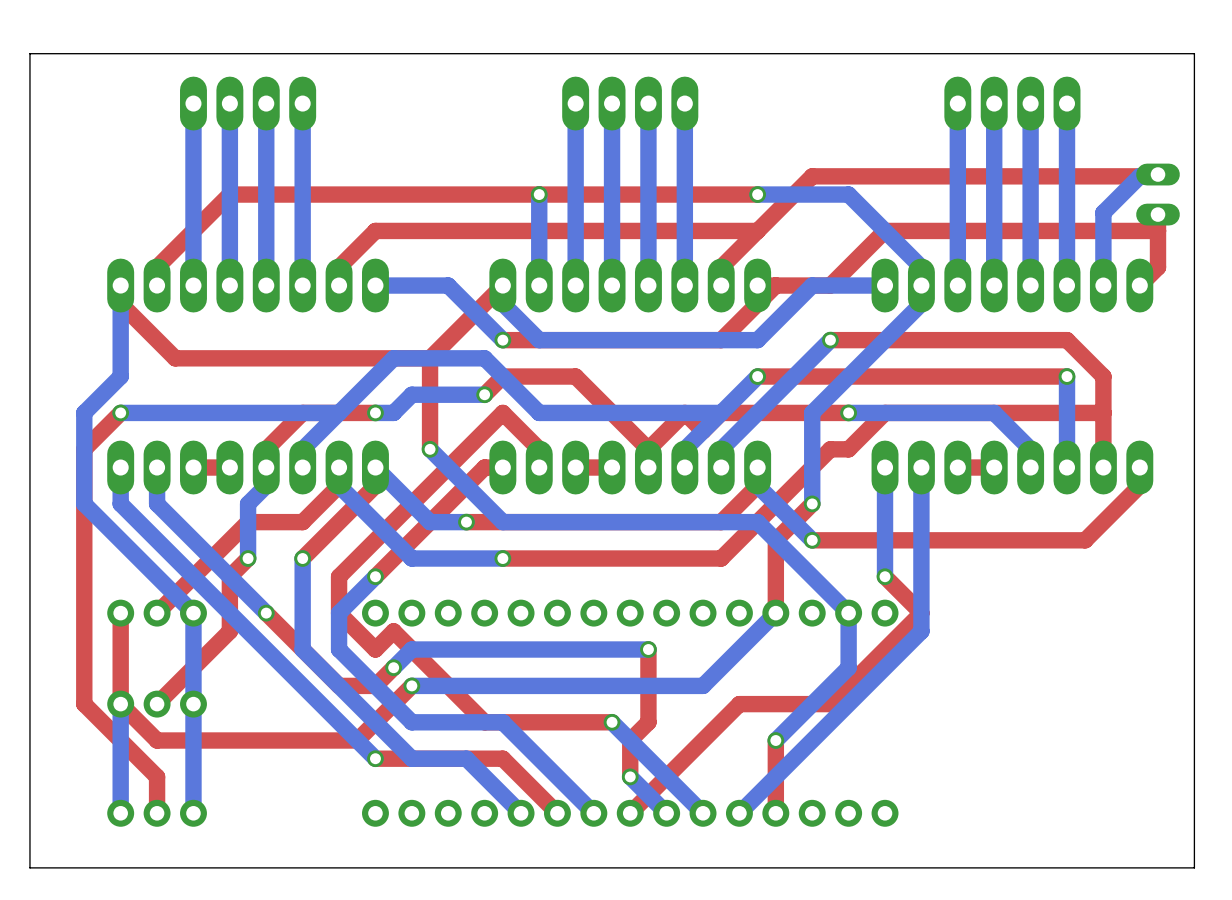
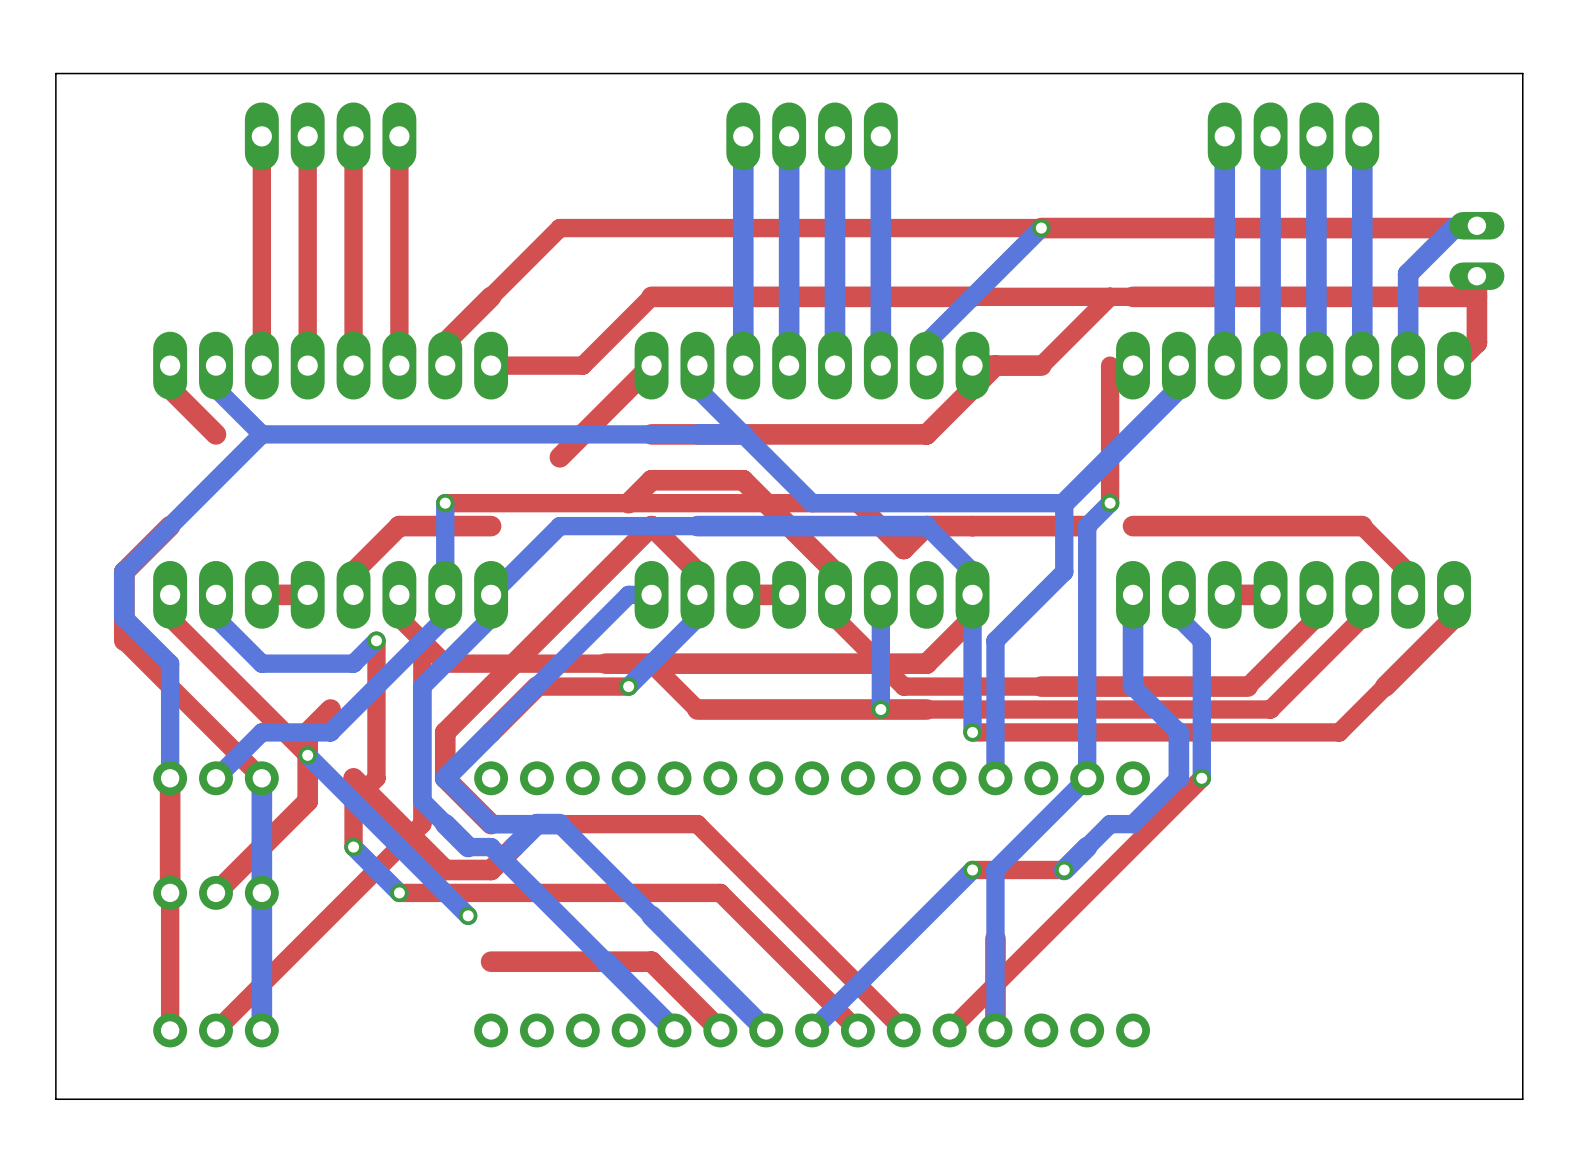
bottom track: (193, 103) (193, 285) -> none
top track: none -> (261, 136) (261, 365)
bottom track: (229, 103) (229, 285) -> none
top track: none -> (307, 136) (307, 365)
bottom track: (266, 103) (266, 285) -> none
top track: none -> (353, 136) (353, 365)
bottom track: (302, 103) (302, 285) -> none
top track: none -> (399, 136) (399, 365)
bottom track: none -> (1041, 228) (926, 342) (926, 365)
top track: (812, 176) (721, 267) (721, 285) -> (1041, 228) (559, 228) (491, 296)
via: none -> (1041, 228)
bottom track: (539, 194) (539, 285) -> none
via: (539, 194) -> none
bottom track: (757, 194) (848, 194) (921, 267) (921, 285) -> none
top track: (757, 194) (229, 194) (157, 267) (157, 285) -> none
via: (757, 194) -> none
top track: (502, 230) (375, 230) -> (651, 296) (582, 365) (491, 365)
top track: (885, 230) (830, 285) (812, 285) -> (1110, 296) (1041, 365)
top track: none -> (1133, 296) (972, 296)
bottom track: (120, 285) (120, 376) (84, 412) (84, 449) -> (261, 434) (124, 571)
bottom track: none -> (215, 365) (215, 388) (261, 434)
bottom track: (375, 285) (448, 285) (502, 340) -> none
bottom track: (502, 285) (502, 303) (539, 340) -> (261, 434) (697, 434)
top track: none -> (1110, 365) (1110, 503)
bottom track: (885, 285) (812, 285) (757, 340) (575, 340) -> none
top track: (157, 340) (175, 358) (430, 358) (430, 449) -> none
via: (502, 340) -> none
bottom track: (830, 340) (721, 449) (721, 467) -> none
top track: (830, 340) (1067, 340) (1103, 376) (1103, 449) -> none
via: (830, 340) -> none
bottom track: (757, 376) (684, 449) (684, 467) -> (880, 709) (880, 594)
via: (757, 376) -> none
bottom track: (1067, 376) (1067, 467) -> none
top track: (1067, 376) (757, 376) -> none
via: (1067, 376) -> none
bottom track: none -> (445, 503) (445, 594)
via: none -> (445, 503)
bottom track: (484, 394) (411, 394) (393, 412) (375, 412) -> none
via: (484, 394) -> none
bottom track: (830, 394) (812, 412) (812, 503) -> none
bottom track: none -> (1110, 503) (1087, 526) (1087, 778) (995, 869) (995, 1030)
via: none -> (1110, 503)
via: (120, 412) -> none
bottom track: (339, 412) (120, 412) -> none
via: (375, 412) -> none
bottom track: (539, 412) (484, 358) (393, 358) (302, 449) (302, 467) -> (697, 526) (559, 526) (491, 594) (491, 617) (422, 686) (422, 801) (445, 824)
top track: (684, 412) (648, 449) -> (880, 526) (857, 503) (445, 503)
bottom track: none -> (926, 526) (972, 571) (972, 594)
bottom track: (848, 412) (994, 412) (1030, 449) (1030, 467) -> none
via: (848, 412) -> none
top track: (885, 412) (848, 449) (830, 449) (721, 558) -> (1362, 594) (1362, 617) (1270, 709) (926, 709)
top track: (1103, 412) (1067, 412) -> (1408, 571) (1362, 526)
bottom track: (430, 449) (502, 522) (757, 522) (848, 613) (848, 667) -> none
via: (430, 449) -> none
bottom track: (120, 467) (120, 503) (375, 758) -> none
top track: none -> (170, 594) (170, 617) (307, 755)
bottom track: (266, 467) (266, 485) (248, 503) (248, 558) -> none
top track: none -> (399, 594) (399, 617) (445, 663) (605, 663)
top track: (339, 467) (339, 485) (302, 522) (248, 522) (157, 613) -> none
bottom track: (375, 467) (430, 522) (466, 522) -> none
top track: (375, 467) (375, 485) (302, 558) -> none
bottom track: none -> (651, 594) (628, 594) (491, 732)
top track: (502, 467) (484, 467) (411, 540) -> (628, 686) (536, 686)
bottom track: none -> (697, 594) (697, 617) (628, 686)
top track: none -> (834, 594) (834, 617) (903, 686) (1041, 686)
bottom track: (84, 485) (84, 503) (193, 613) -> (124, 617) (170, 663) (170, 778)
bottom track: (157, 485) (157, 503) (266, 613) -> (215, 617) (261, 663) (353, 663) (376, 640)
bottom track: (339, 485) (411, 558) (502, 558) -> (445, 617) (330, 732) (261, 732) (215, 778)
bottom track: (757, 485) (812, 540) -> (972, 617) (972, 732)
bottom track: (921, 485) (921, 576) -> (1178, 617) (1201, 640) (1201, 778)
top track: (84, 503) (84, 704) (157, 776) (157, 813) -> (124, 640) (261, 778)
top track: none -> (376, 640) (376, 778) (353, 801) (353, 847)
via: none -> (376, 640)
top track: none -> (422, 640) (422, 824) (215, 1030)
top track: (812, 503) (775, 540) (775, 613) -> none
via: (812, 503) -> none
via: (466, 522) -> none
via: none -> (628, 686)
via: (812, 540) -> none
bottom track: (885, 540) (885, 576) -> (1133, 686) (1178, 732)
top track: (1085, 540) (976, 540) -> (1316, 594) (1316, 617) (1247, 686)
top track: none -> (1385, 686) (1339, 732) (972, 732)
via: (248, 558) -> none
bottom track: (302, 558) (302, 649) (411, 758) (466, 758) -> none
via: (302, 558) -> none
via: (502, 558) -> none
top track: (539, 558) (502, 558) -> (697, 709) (651, 663)
via: none -> (880, 709)
via: (375, 576) -> none
via: none -> (972, 732)
top track: (885, 576) (921, 613) (830, 704) (739, 704) (630, 813) -> none
via: (885, 576) -> none
bottom track: none -> (307, 755) (468, 915)
via: none -> (307, 755)
via: (266, 613) -> none
bottom track: (339, 613) (339, 649) -> (445, 778) (491, 824) (536, 824)
bottom track: (775, 613) (703, 685) (411, 685) -> (995, 778) (995, 640) (1064, 571) (1064, 503) (812, 503) (697, 388) (697, 365)
bottom track: (921, 613) (921, 631) (739, 813) -> (1178, 778) (1133, 824) (1110, 824) (1087, 847)
top track: none -> (1201, 778) (949, 1030)
via: none -> (1201, 778)
top track: (375, 649) (393, 631) (484, 722) (612, 722) -> (491, 824) (697, 824) (903, 1030)
bottom track: (648, 649) (430, 649) -> (651, 915) (559, 824)
top track: (648, 649) (648, 722) (630, 740) (630, 776) -> none
via: (648, 649) -> none
bottom track: none -> (353, 847) (399, 892)
via: none -> (353, 847)
bottom track: (357, 667) (411, 722) (502, 722) -> (468, 847) (491, 847) (605, 961)
via: (393, 667) -> none
top track: (411, 685) (357, 740) (157, 740) (120, 704) -> (170, 1030) (170, 892)
via: (411, 685) -> none
bottom track: none -> (972, 869) (812, 1030)
via: none -> (972, 869)
bottom track: (830, 685) (775, 740) -> none
top track: none -> (1064, 869) (972, 869)
via: none -> (1064, 869)
bottom track: (120, 704) (120, 813) -> none
top track: none -> (399, 892) (720, 892) (857, 1030)
via: none -> (399, 892)
via: none -> (468, 915)
bottom track: (612, 722) (703, 813) -> none
via: (612, 722) -> none
via: (775, 740) -> none
via: (375, 758) -> none
bottom track: (630, 776) (666, 813) -> none
via: (630, 776) -> none

